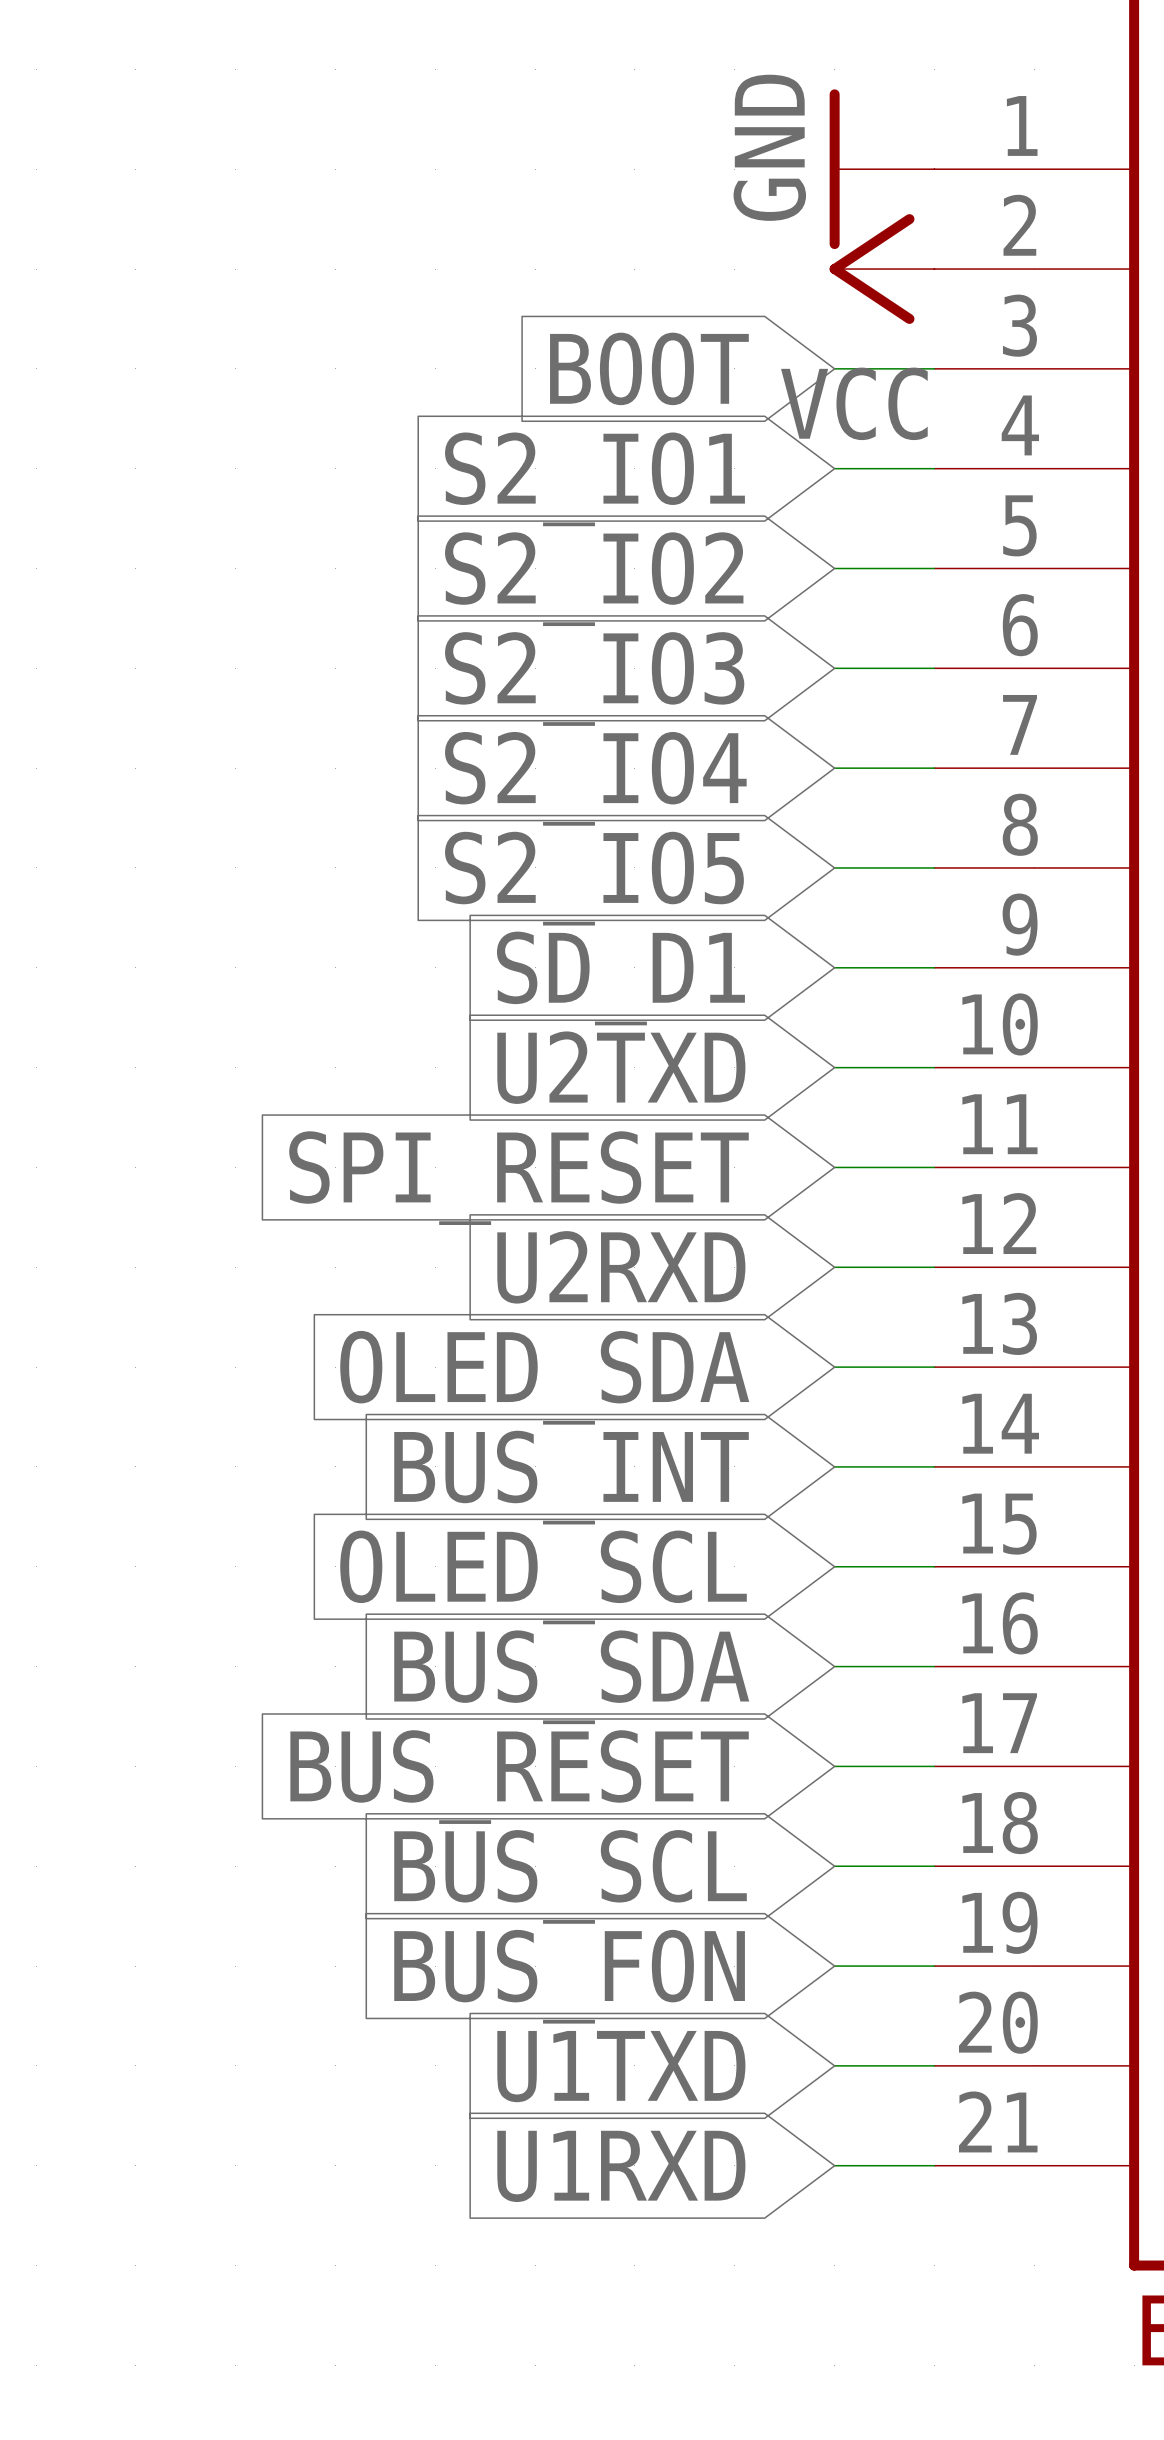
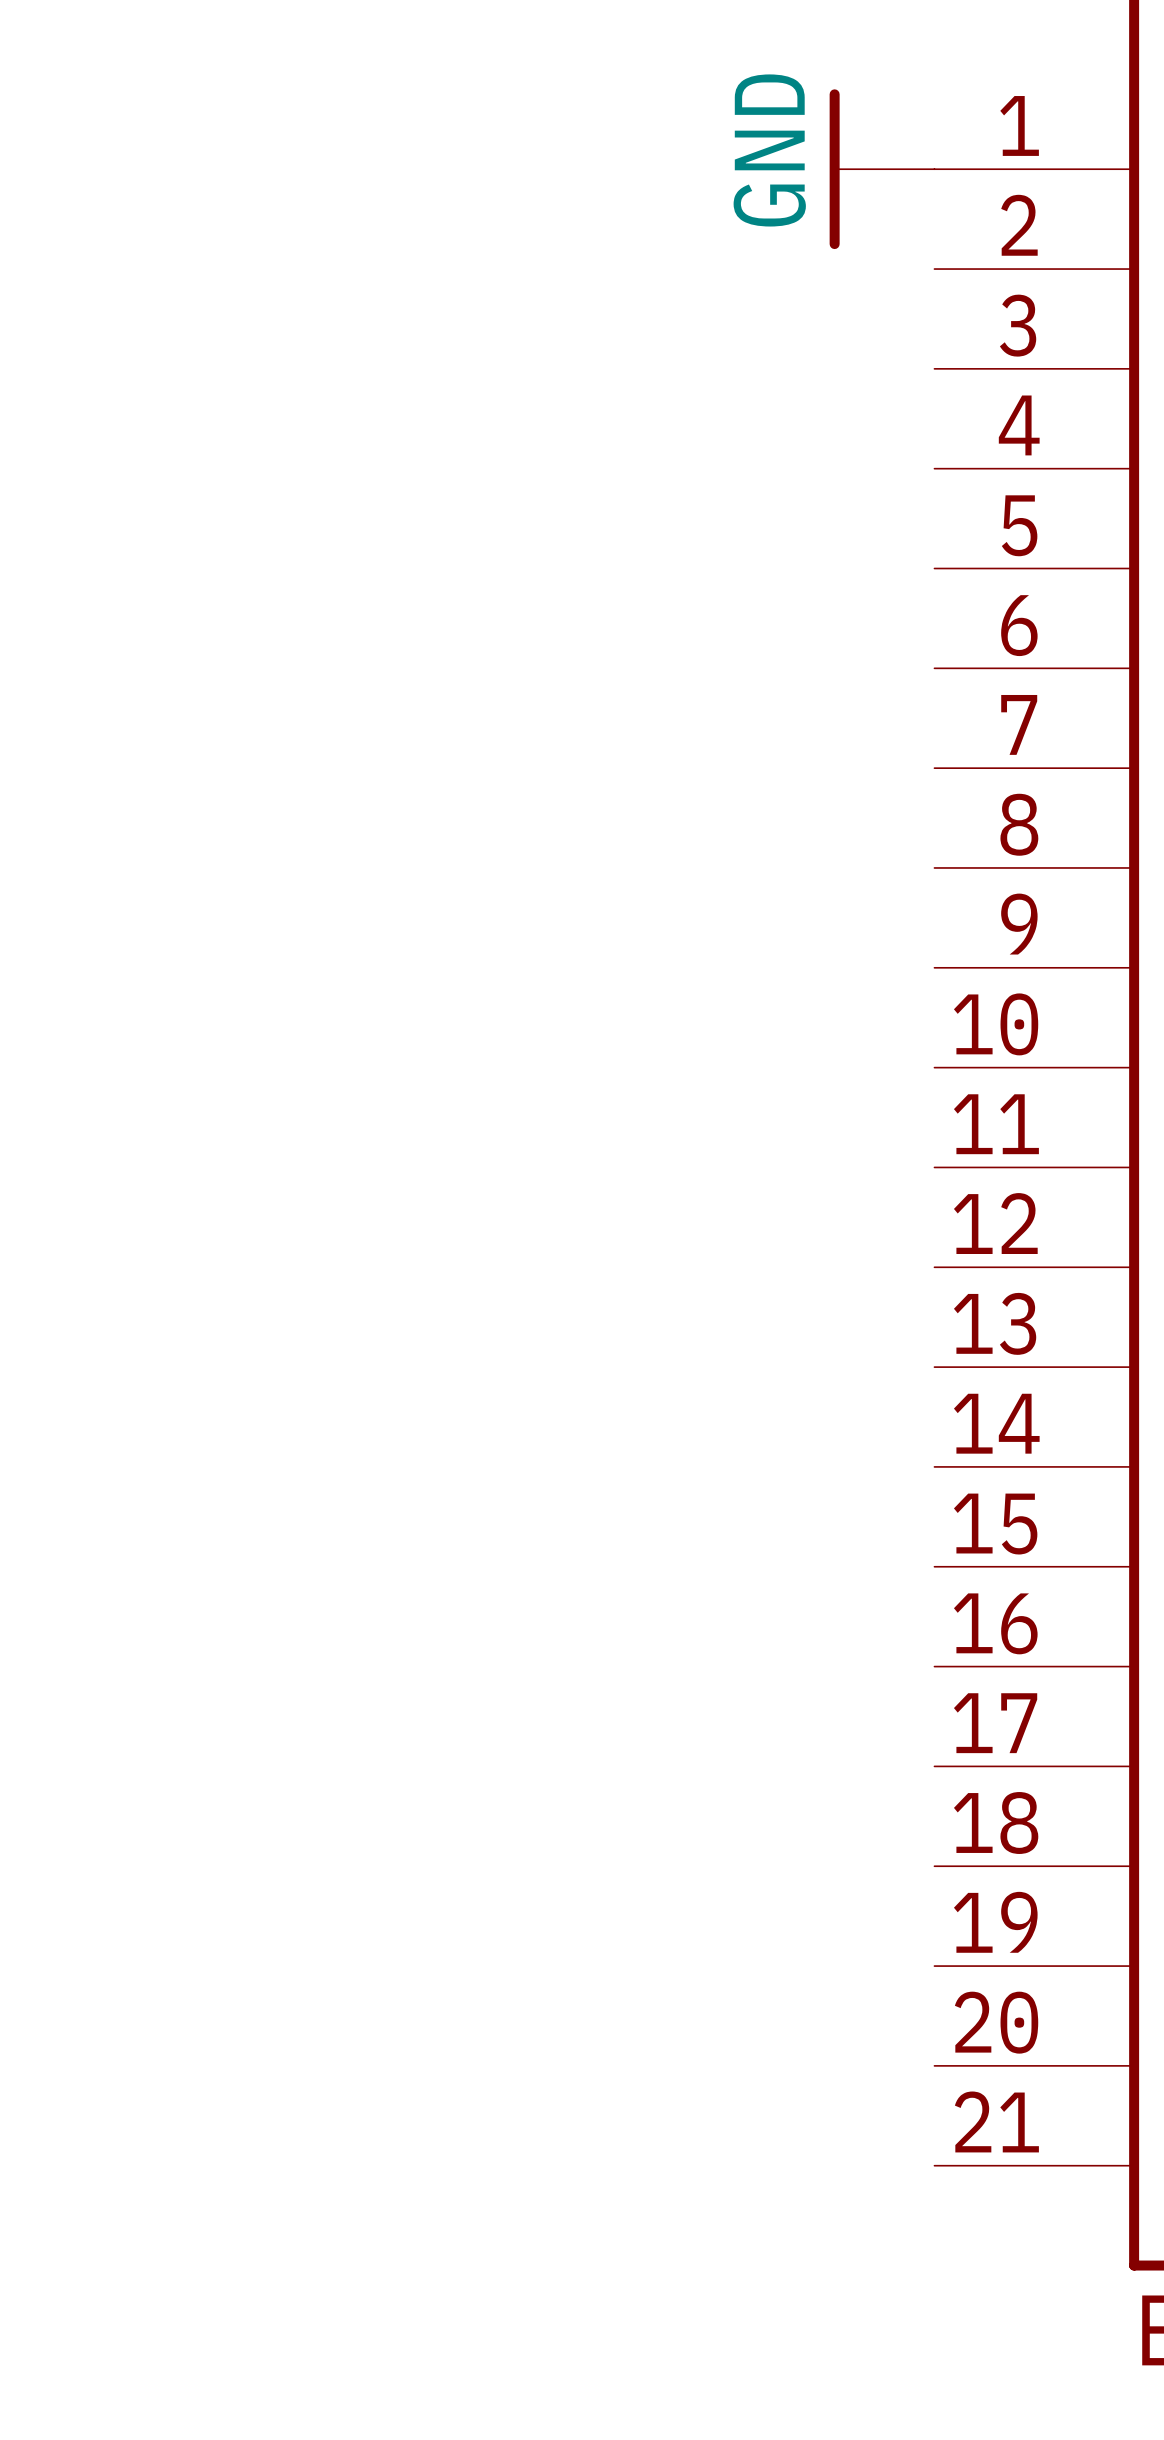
power symbol: VCC (882, 269) -> none
global label: BOOT (649, 368) -> none
wire: (834, 368) (934, 368) -> none
wire: (834, 468) (934, 468) -> none
global label: S2_IO1 (594, 479) -> none
wire: (834, 568) (934, 568) -> none
global label: S2_IO2 (594, 579) -> none
wire: (834, 668) (934, 668) -> none
global label: S2_IO3 (594, 679) -> none
wire: (834, 768) (934, 768) -> none
global label: S2_IO4 (595, 778) -> none
wire: (834, 867) (934, 867) -> none
global label: S2_IO5 (594, 878) -> none
wire: (834, 967) (934, 967) -> none
global label: SD_D1 (620, 978) -> none
global label: U2TXD (621, 1067) -> none
wire: (834, 1067) (934, 1067) -> none
wire: (834, 1167) (934, 1167) -> none
global label: SPI_RESET (519, 1178) -> none
global label: U2RXD (621, 1267) -> none
wire: (834, 1267) (934, 1267) -> none
wire: (834, 1367) (934, 1367) -> none
global label: OLED_SDA (544, 1377) -> none
wire: (834, 1466) (934, 1466) -> none
global label: BUS_INT (571, 1477) -> none
wire: (834, 1566) (934, 1566) -> none
global label: OLED_SCL (543, 1577) -> none
wire: (834, 1666) (934, 1666) -> none
global label: BUS_SDA (571, 1677) -> none
wire: (834, 1766) (934, 1766) -> none
global label: BUS_RESET (519, 1777) -> none
wire: (834, 1866) (934, 1866) -> none
global label: BUS_SCL (570, 1876) -> none
wire: (834, 1966) (934, 1966) -> none
global label: BUS_FON (569, 1976) -> none
wire: (834, 2065) (934, 2065) -> none
global label: U1TXD (621, 2066) -> none
wire: (834, 2165) (934, 2165) -> none
global label: U1RXD (621, 2166) -> none

